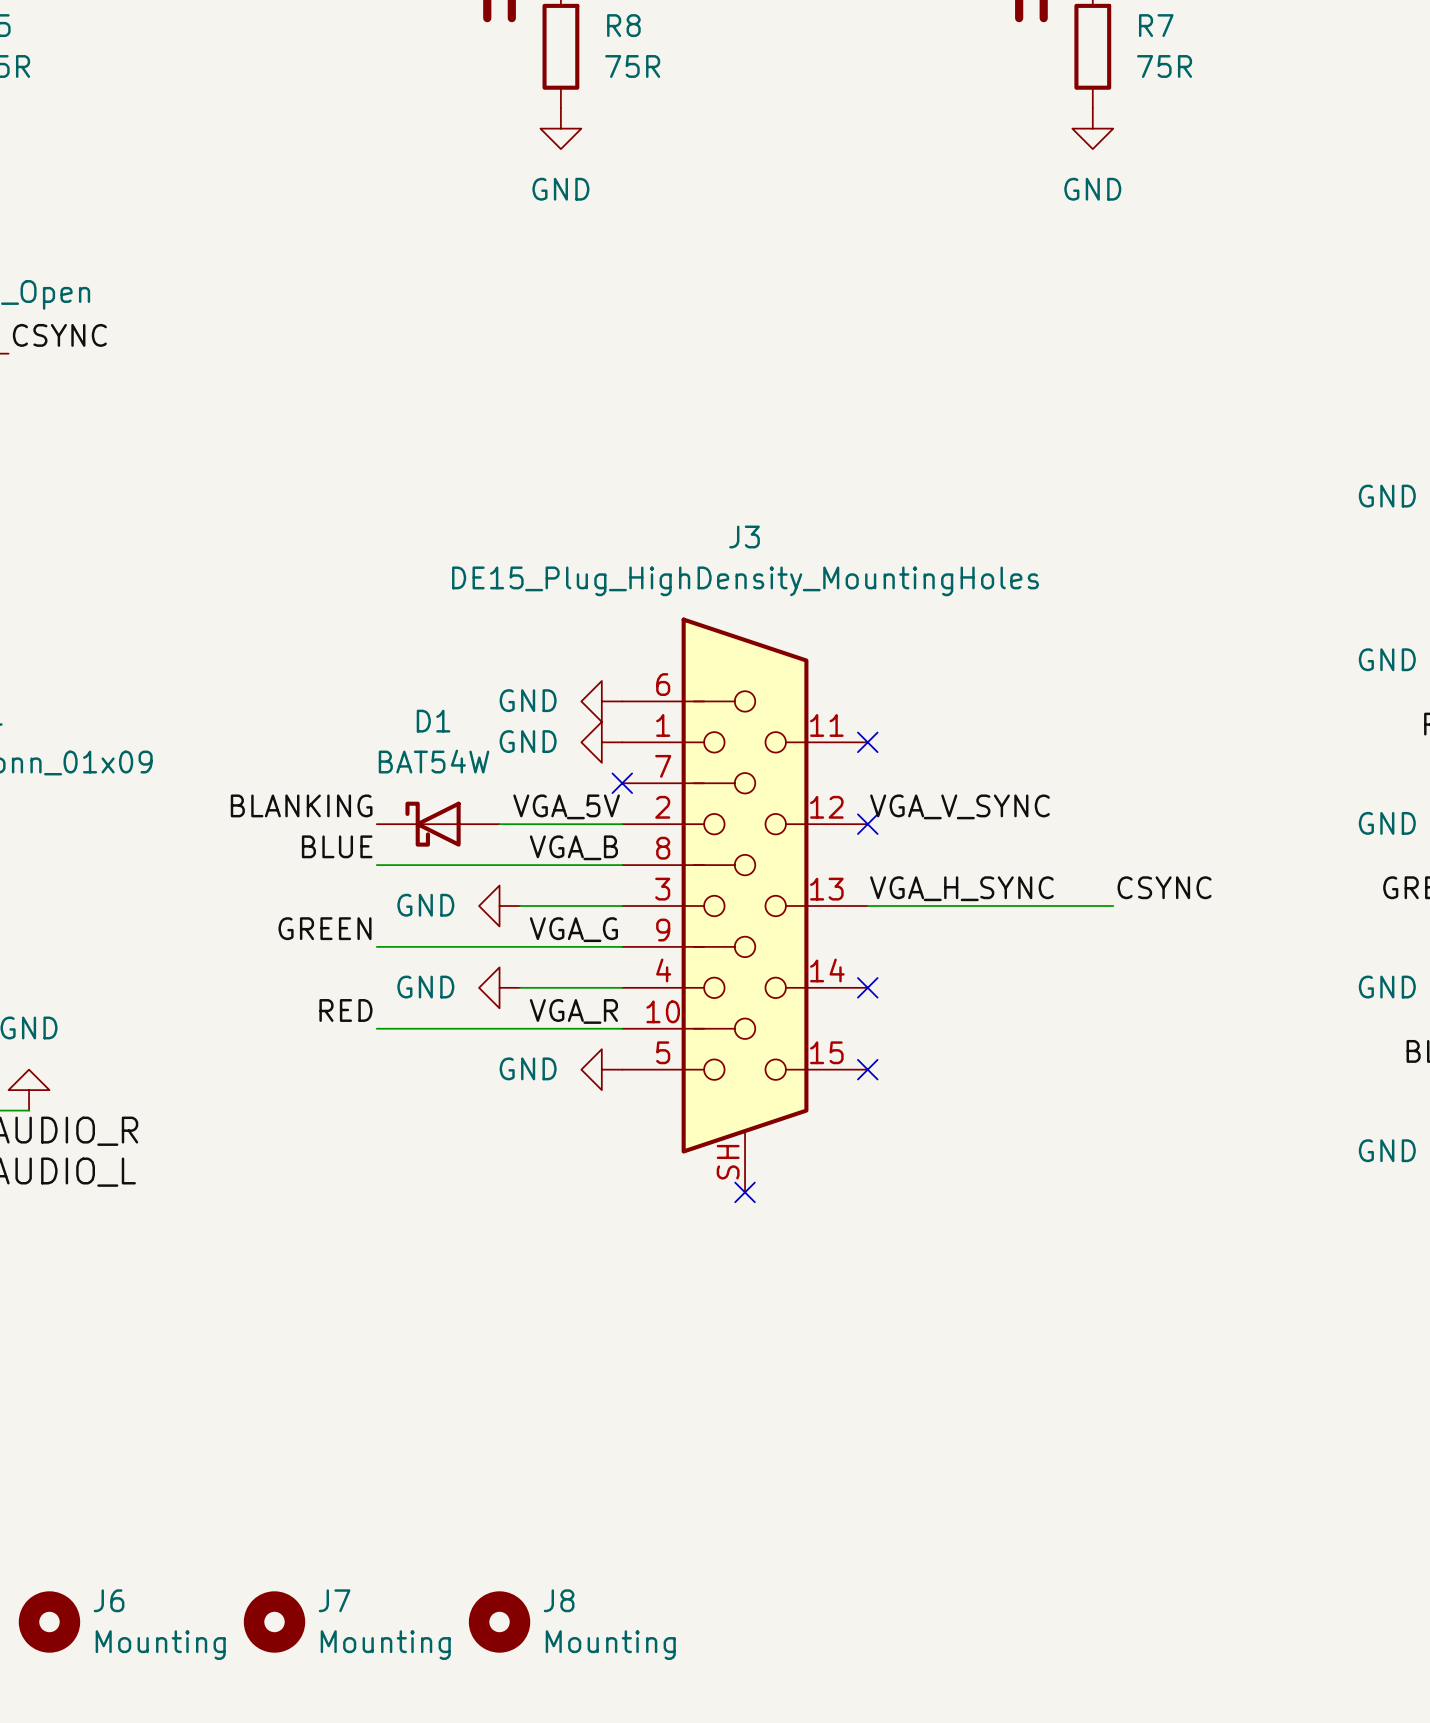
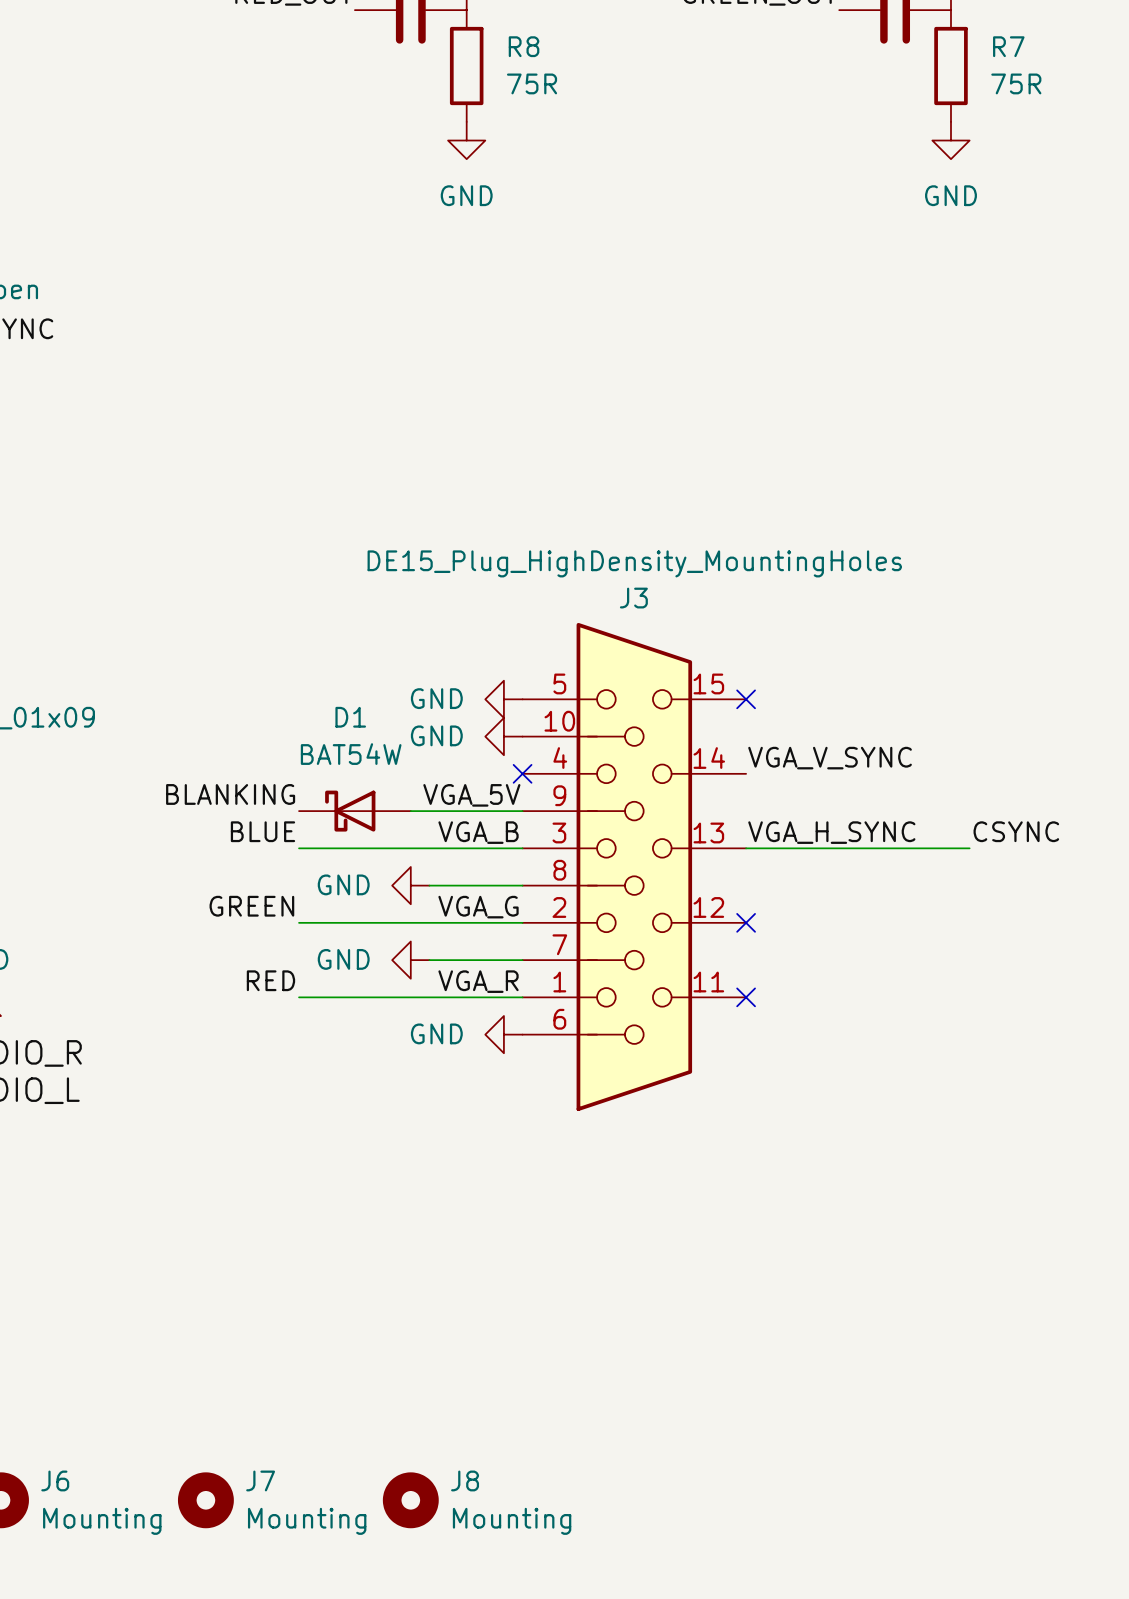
J3 name position: J3 (744, 537) -> J3 (633, 598)
J3 symbol: [622, 617, 868, 1193] -> [522, 622, 747, 1111]
power symbol: GND (601, 701) -> none
power symbol: none -> GND (503, 736)
no-connect mark position: (622, 783) -> (522, 773)
label: BLANKING (301, 805) -> none
label: VGA_5V (566, 806) -> none
D1 position: (438, 824) -> (354, 811)
wire: (499, 824) (622, 824) -> none
no-connect mark: (867, 824) -> none
label: BLUE (337, 846) -> BLANKING (230, 794)
label: VGA_B (573, 847) -> VGA_5V (471, 795)
label: none -> BLUE (262, 831)
label: none -> VGA_B (478, 832)
power symbol: GND (499, 906) -> none
label position: GREEN (325, 928) -> GREEN (251, 906)
label position: VGA_G (573, 929) -> VGA_G (478, 907)
wire: (376, 946) (520, 946) -> (299, 848) (429, 848)
power symbol: none -> GND (410, 885)
power symbol: GND (499, 987) -> none
label position: RED (345, 1010) -> RED (270, 980)
label position: VGA_R (573, 1011) -> VGA_R (478, 981)
wire: (376, 1028) (520, 1028) -> (299, 922) (429, 922)
power symbol: none -> GND (410, 960)
wire: none -> (299, 997) (522, 997)
power symbol position: GND (601, 1069) -> GND (503, 1034)
no-connect mark: (745, 1192) -> none

